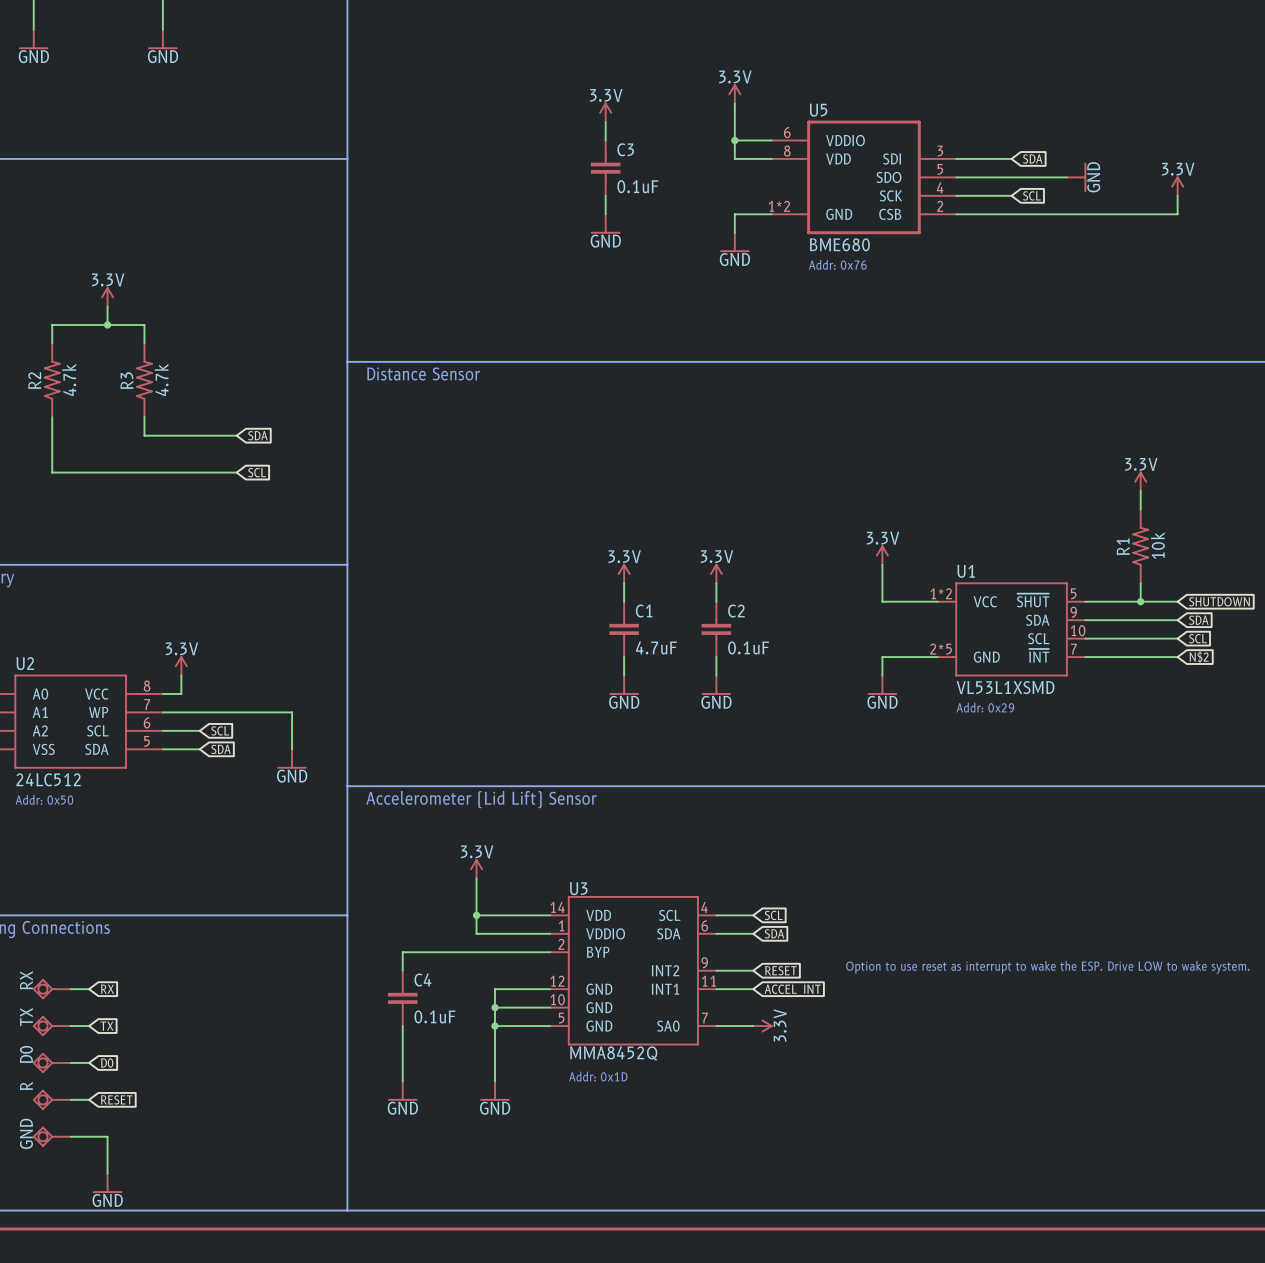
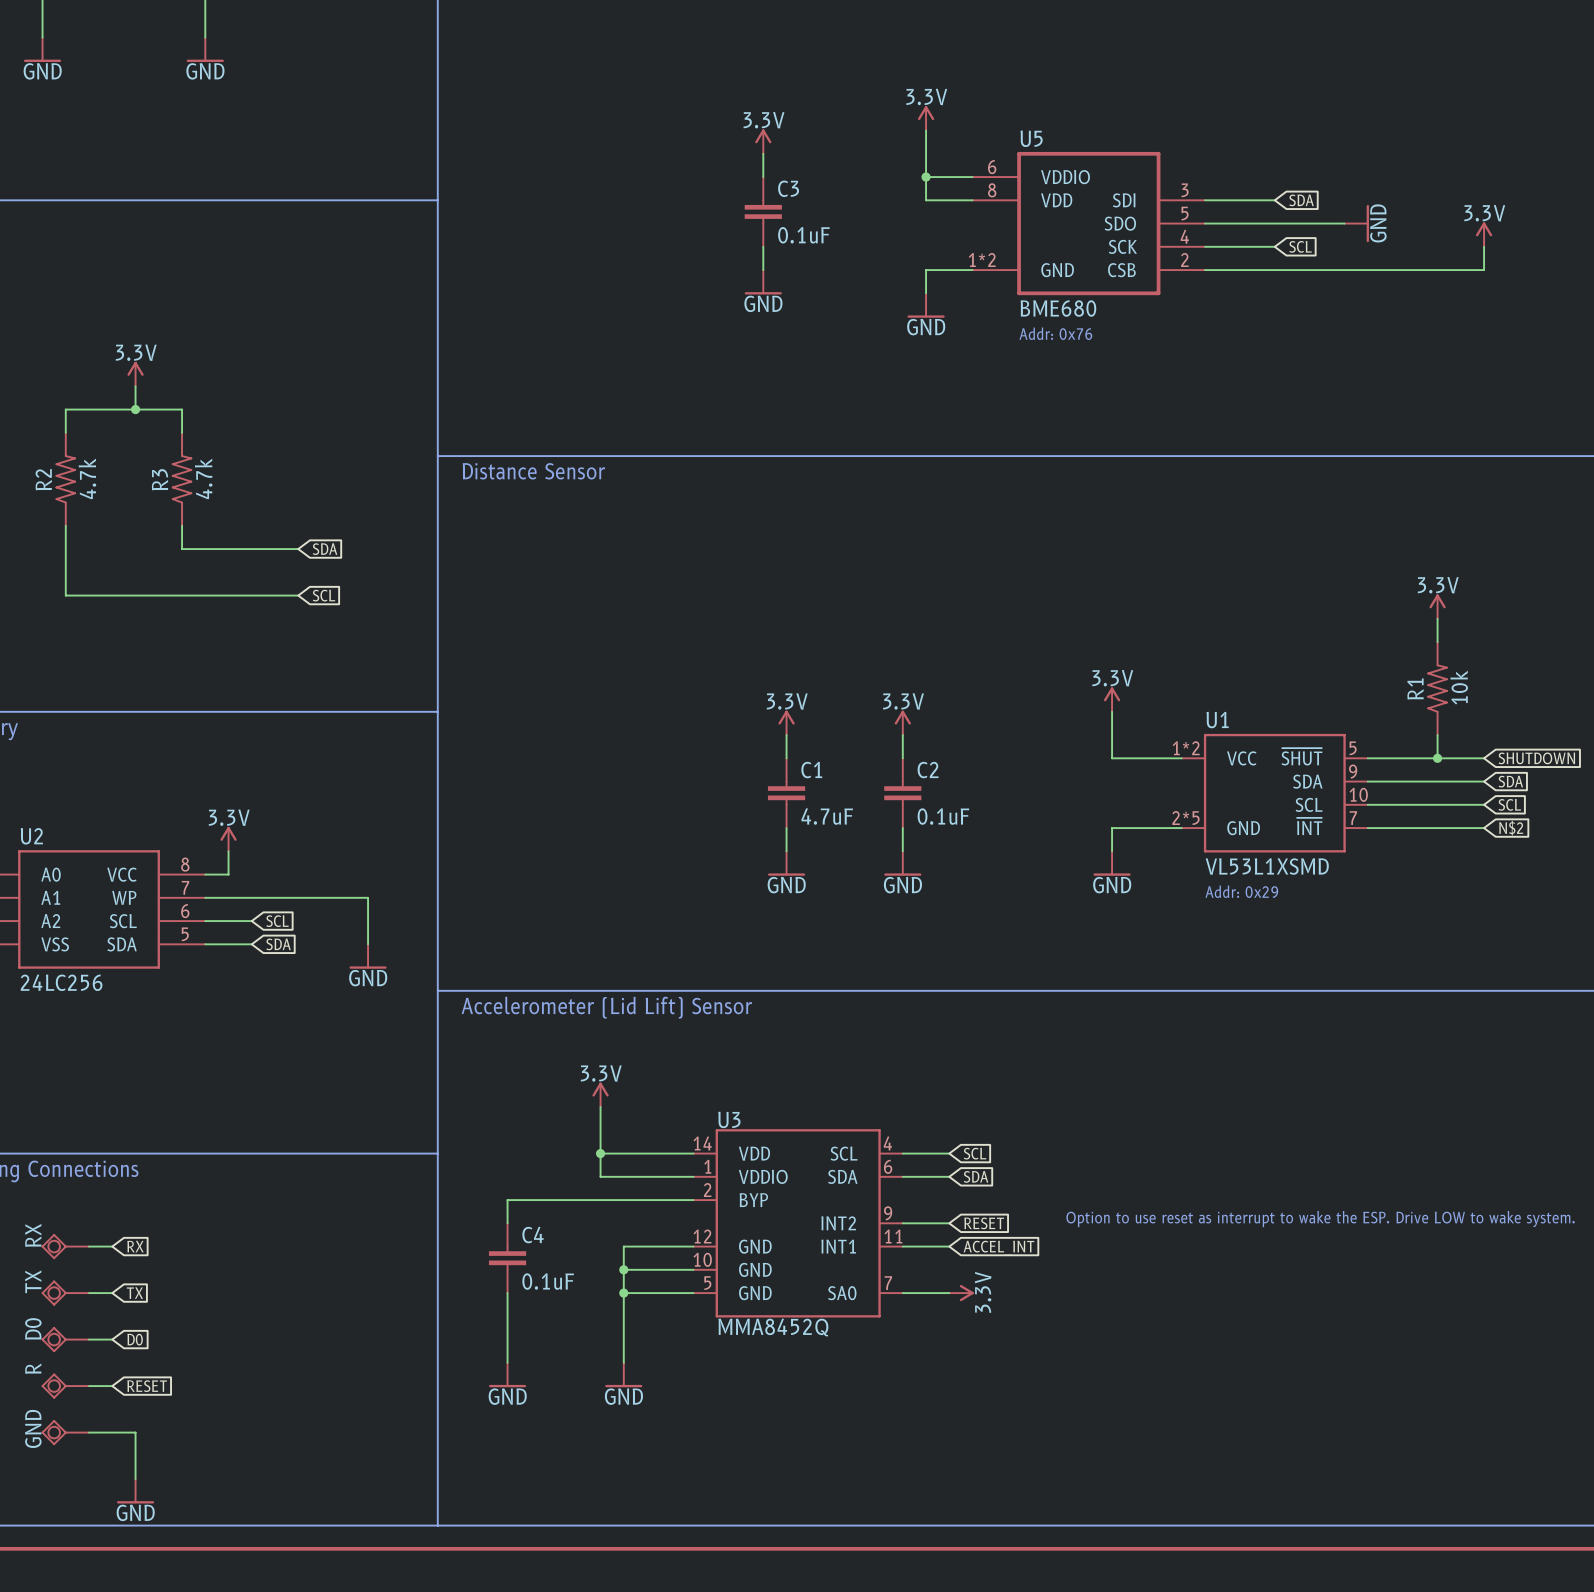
U2 value: 24LC512 (48, 779) -> 24LC256 (61, 982)
text: Addr: 0x50 (44, 799) -> none
text: Addr: 0x1D (598, 1076) -> none

